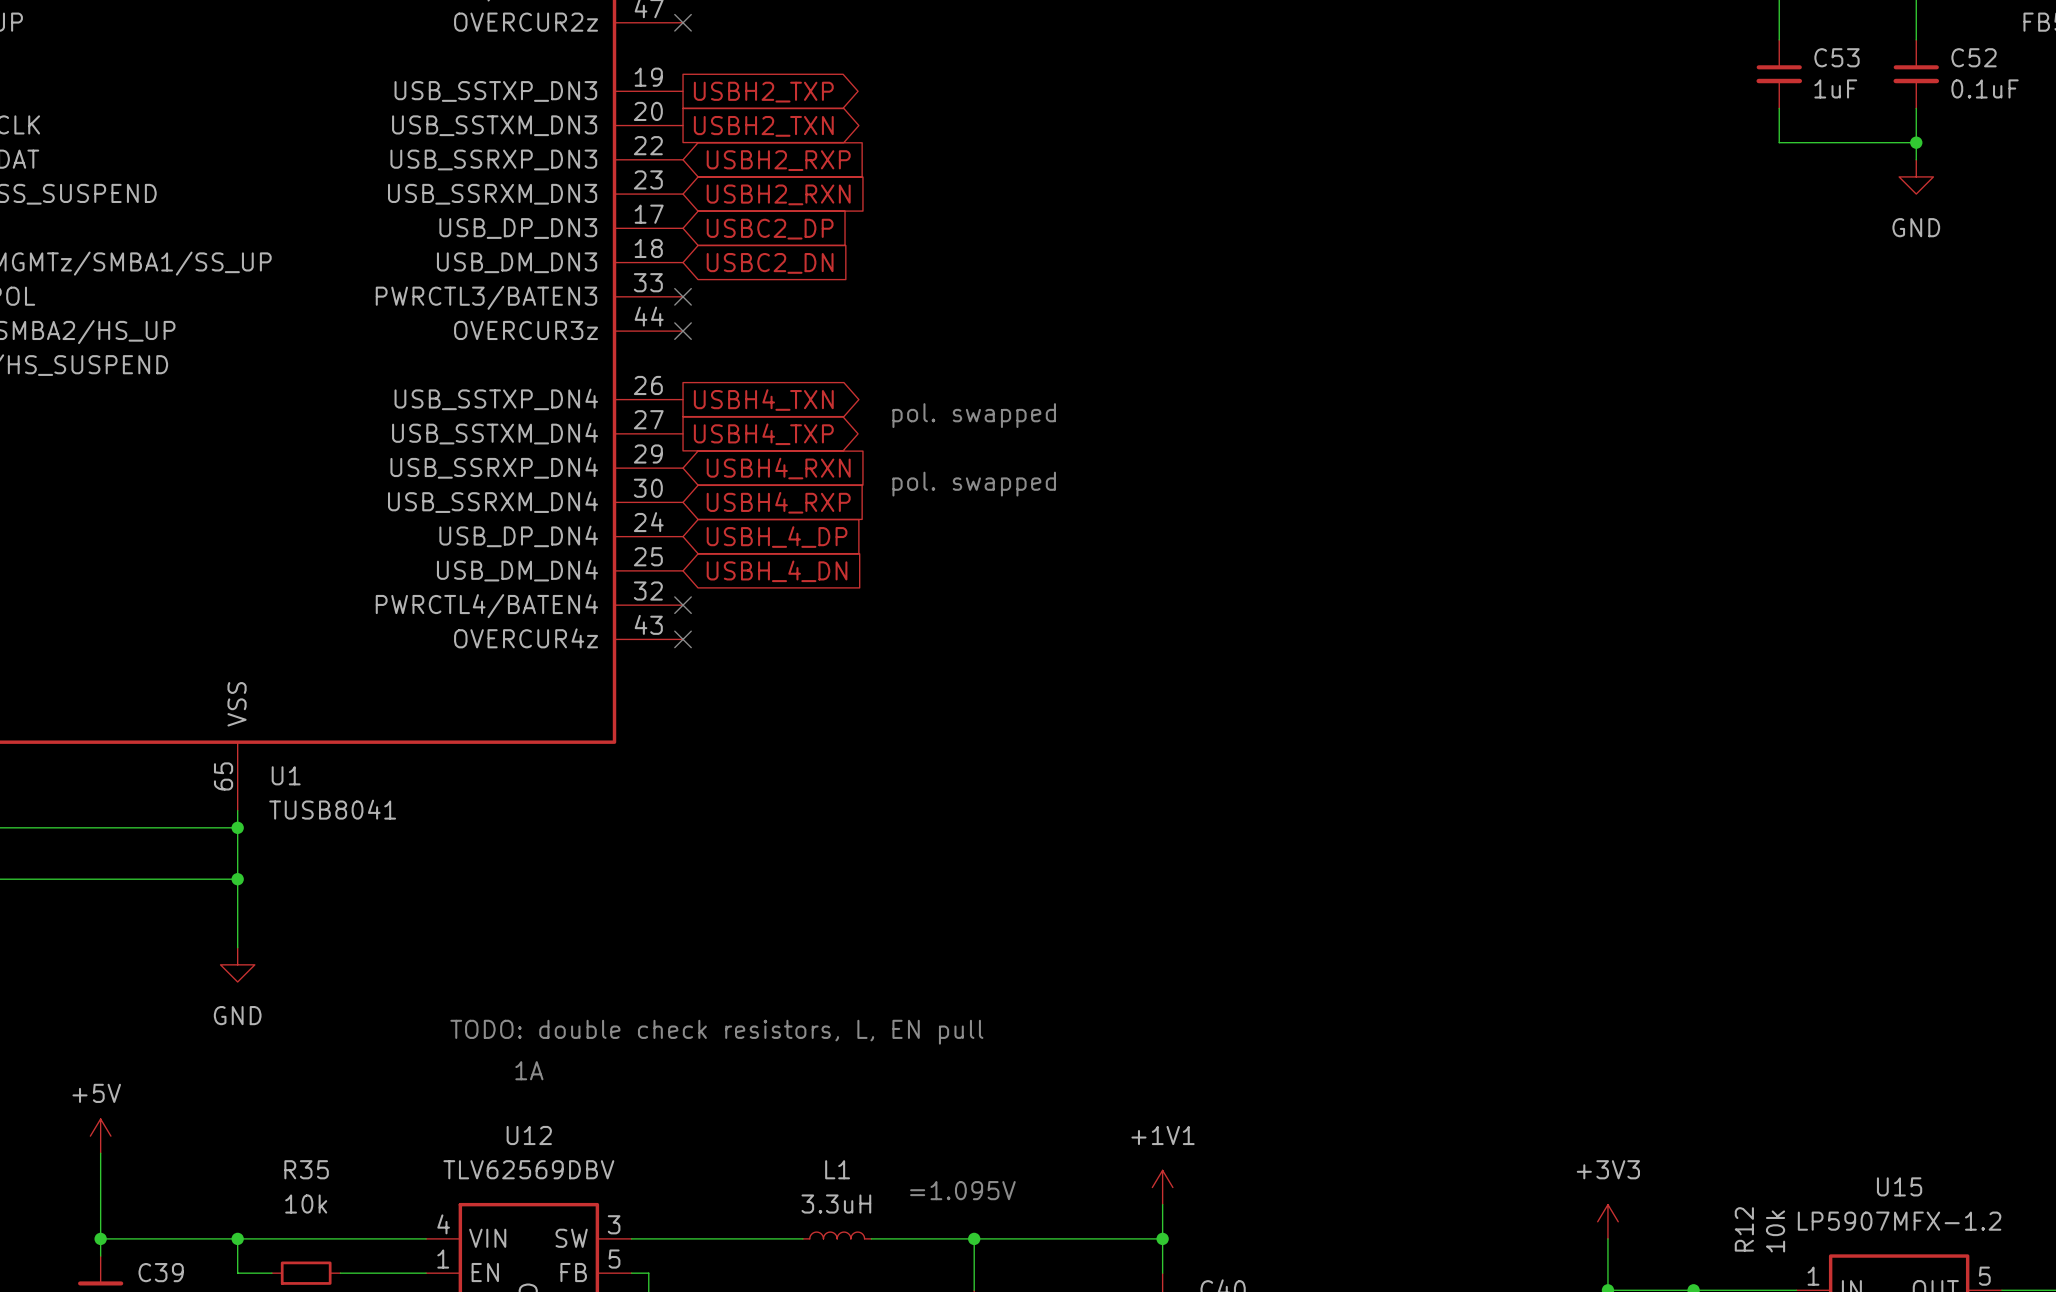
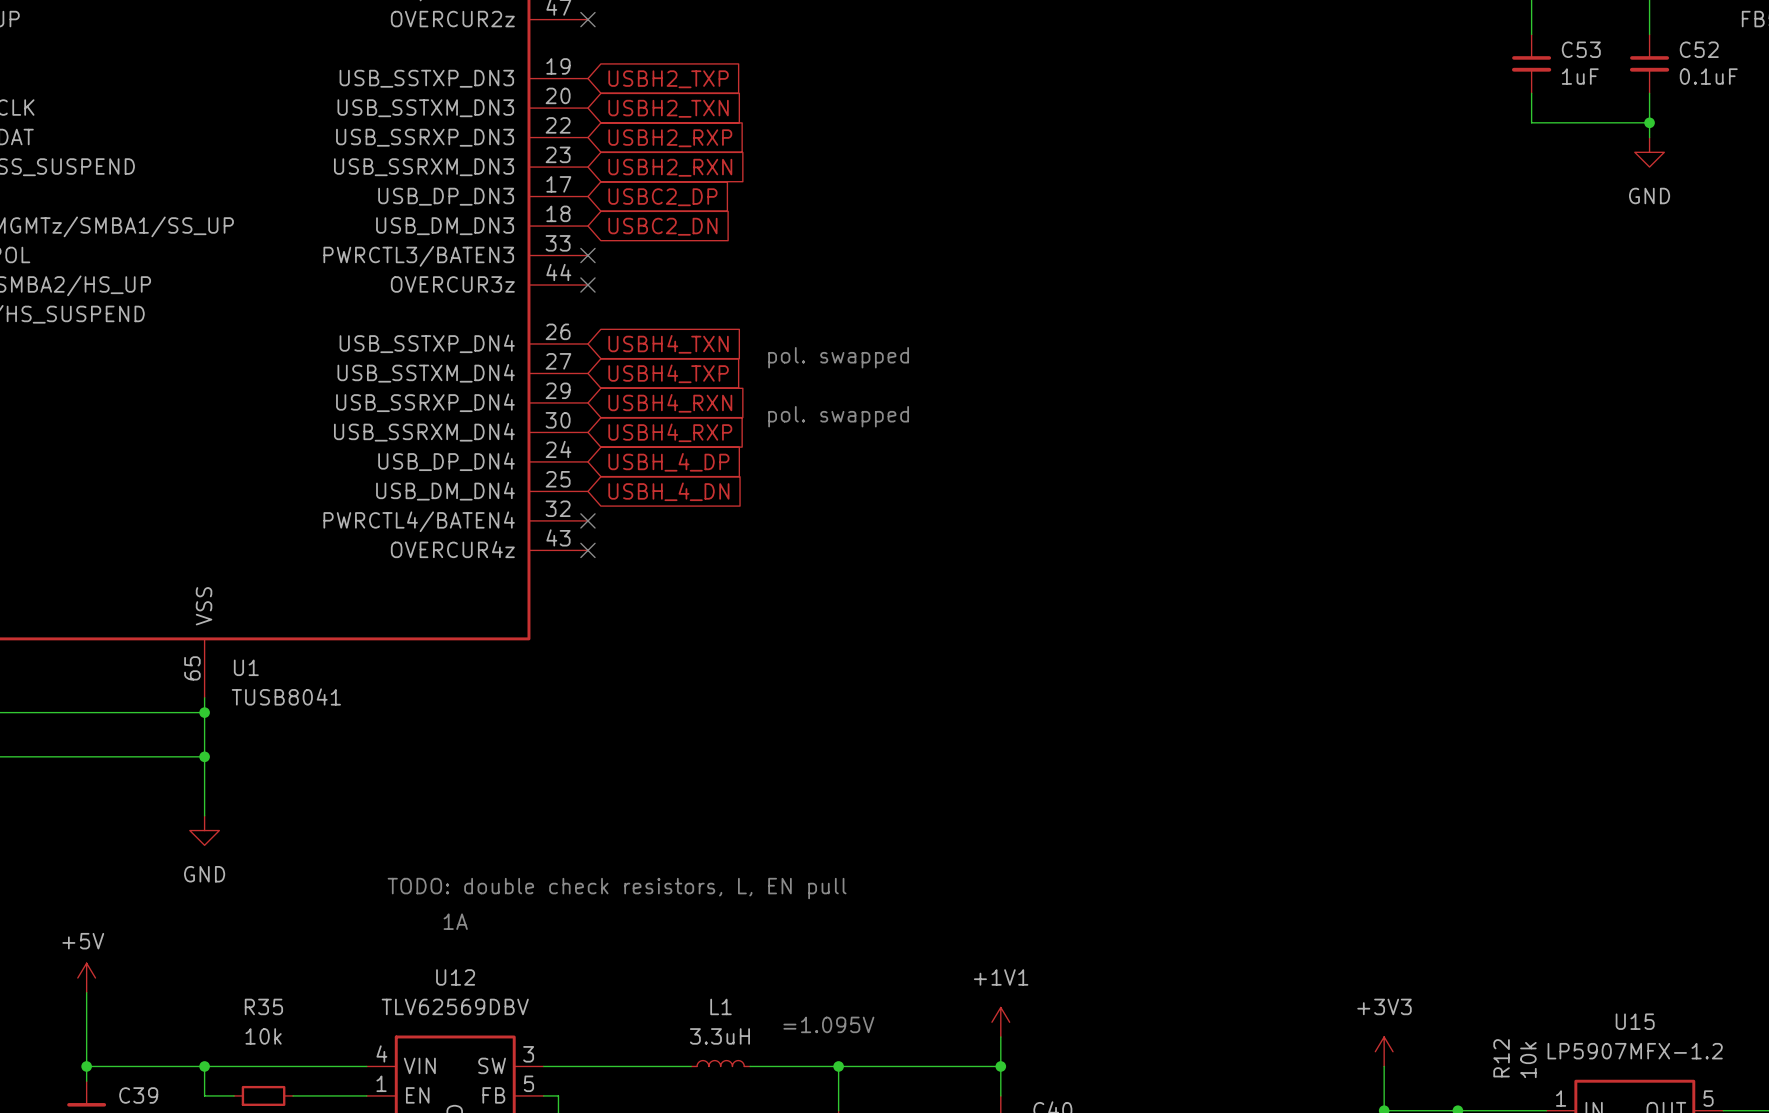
global label shape: output (763, 92) -> input (668, 79)
global label shape: output (763, 126) -> input (668, 108)
global label shape: output (763, 400) -> input (668, 344)
global label shape: output (763, 434) -> input (668, 373)

